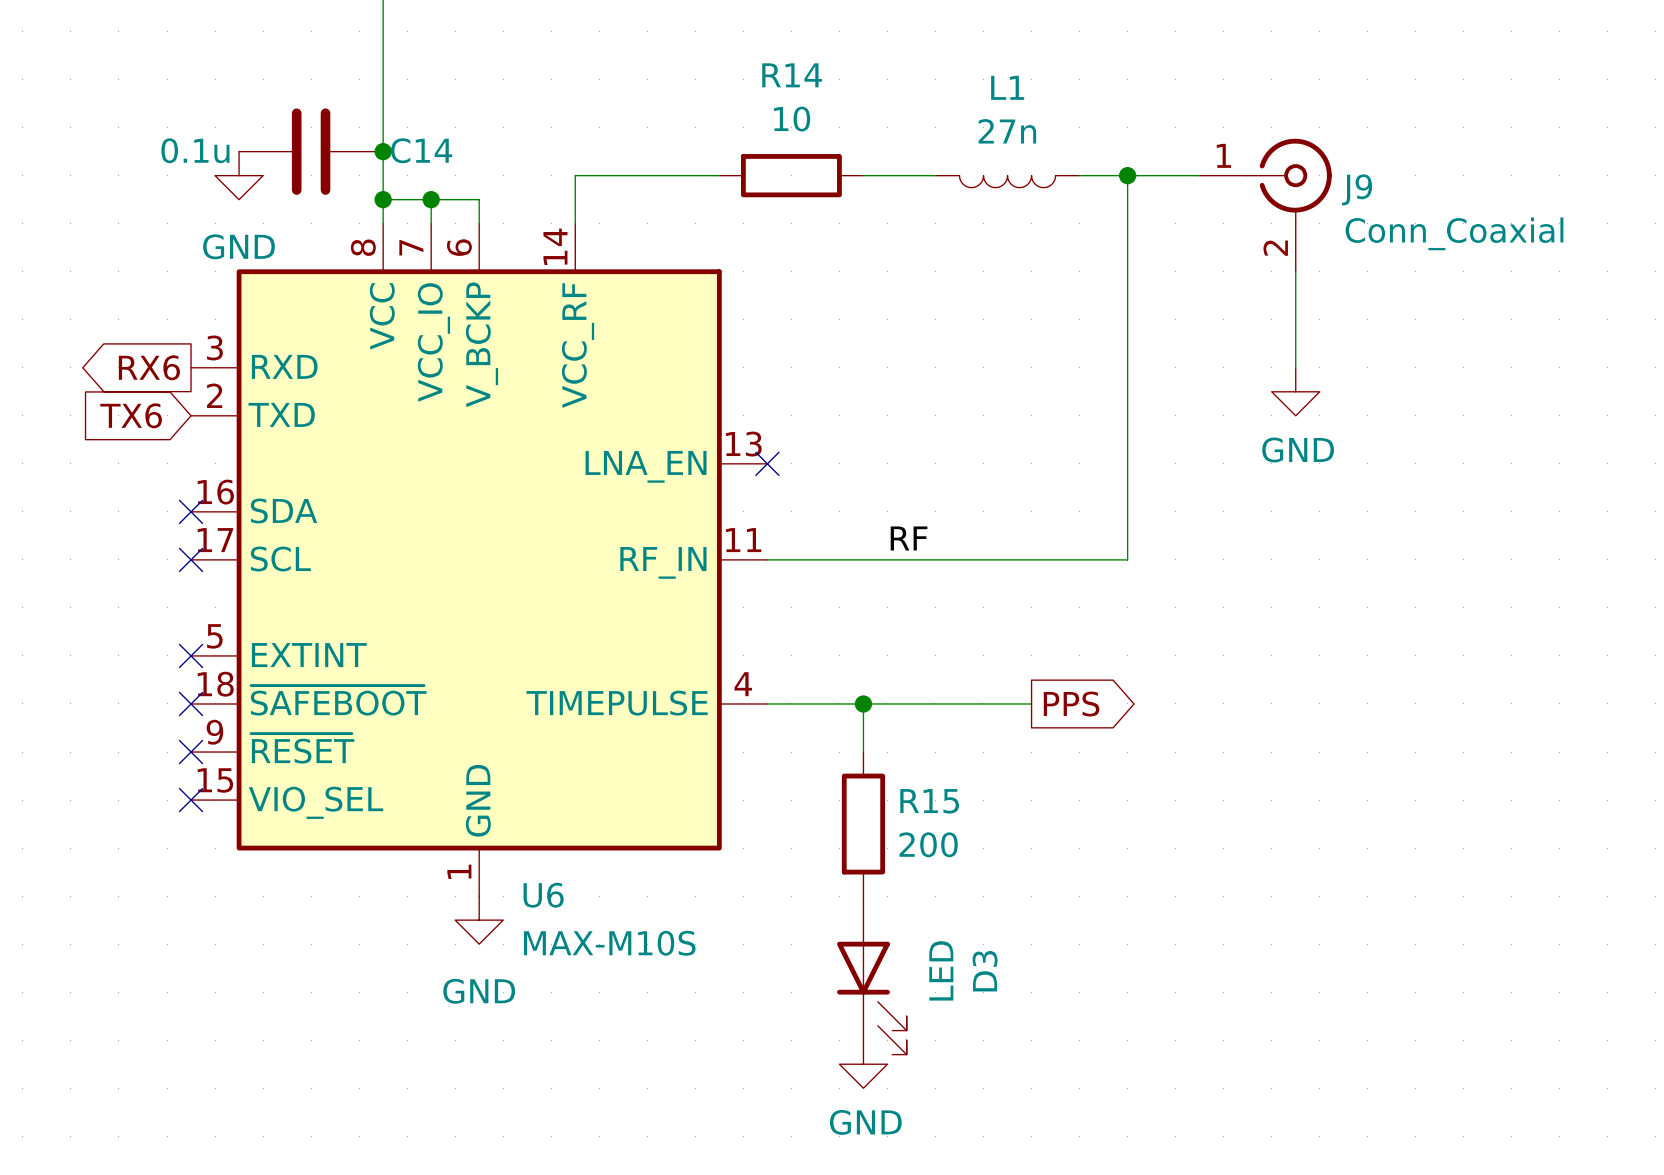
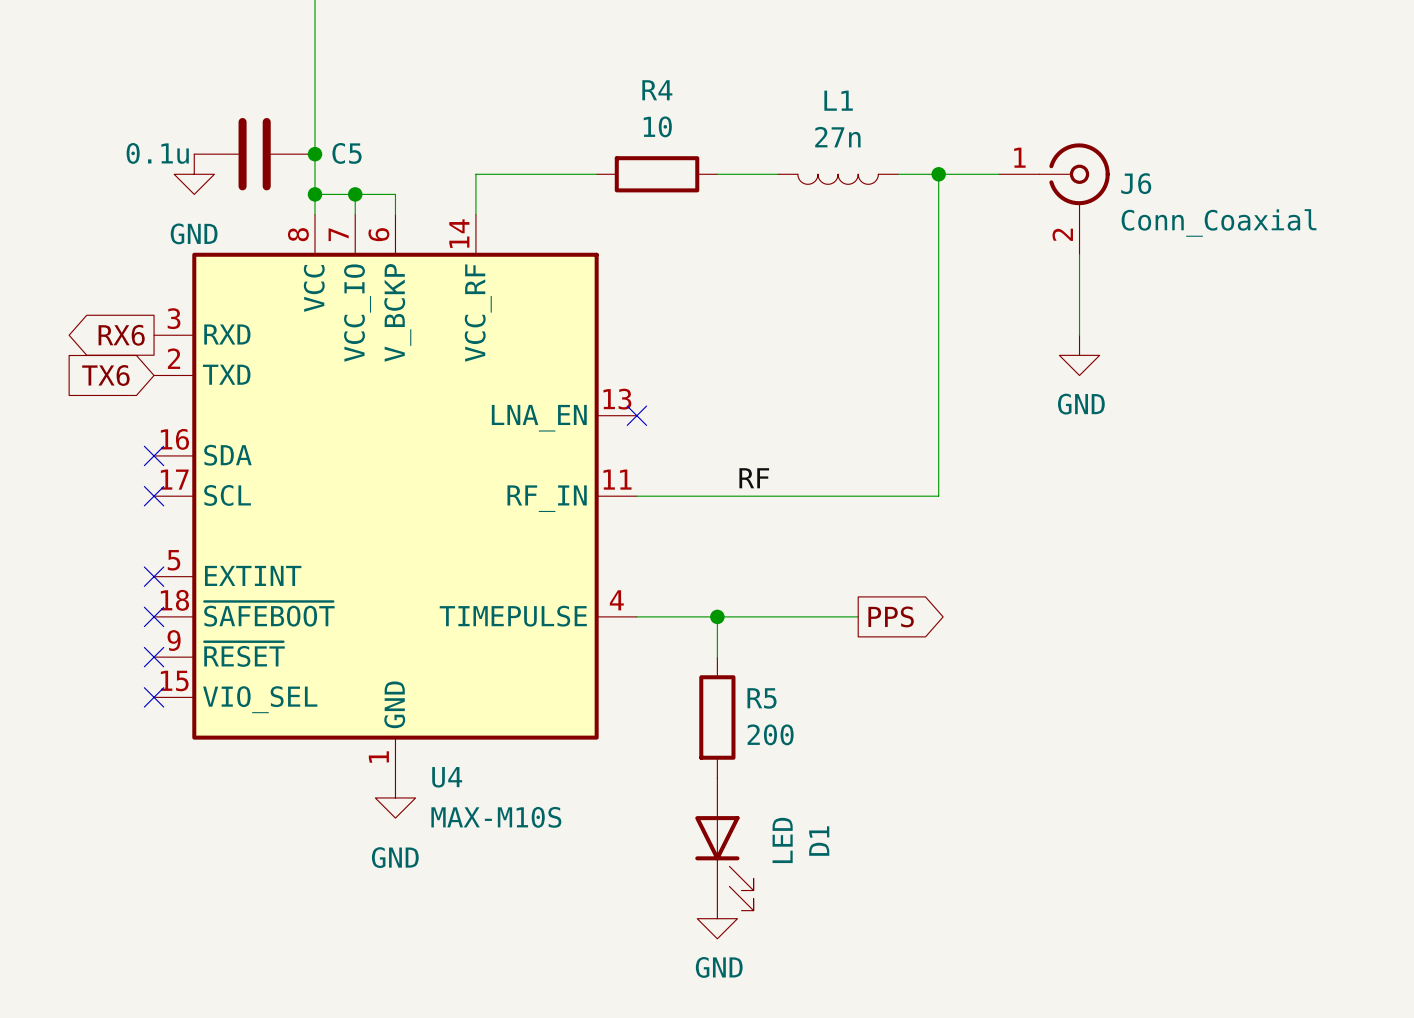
R14 name: R14 (792, 75) -> R4 (657, 90)
C14 name: C14 (421, 150) -> C5 (347, 153)
J9 name: J9 (1357, 189) -> J6 (1136, 183)
R15 name: R15 (929, 801) -> R5 (762, 698)
U6 name: U6 (543, 895) -> U4 (447, 777)
D3 name: D3 (985, 971) -> D1 (819, 841)

